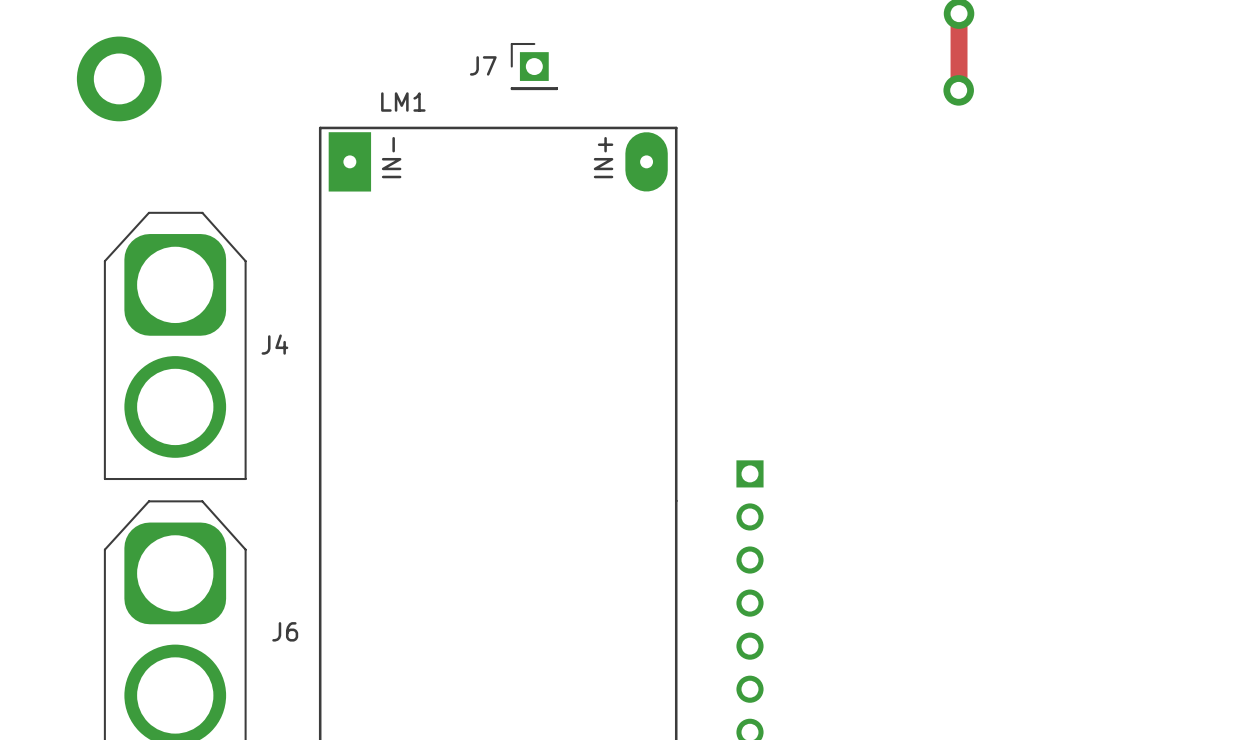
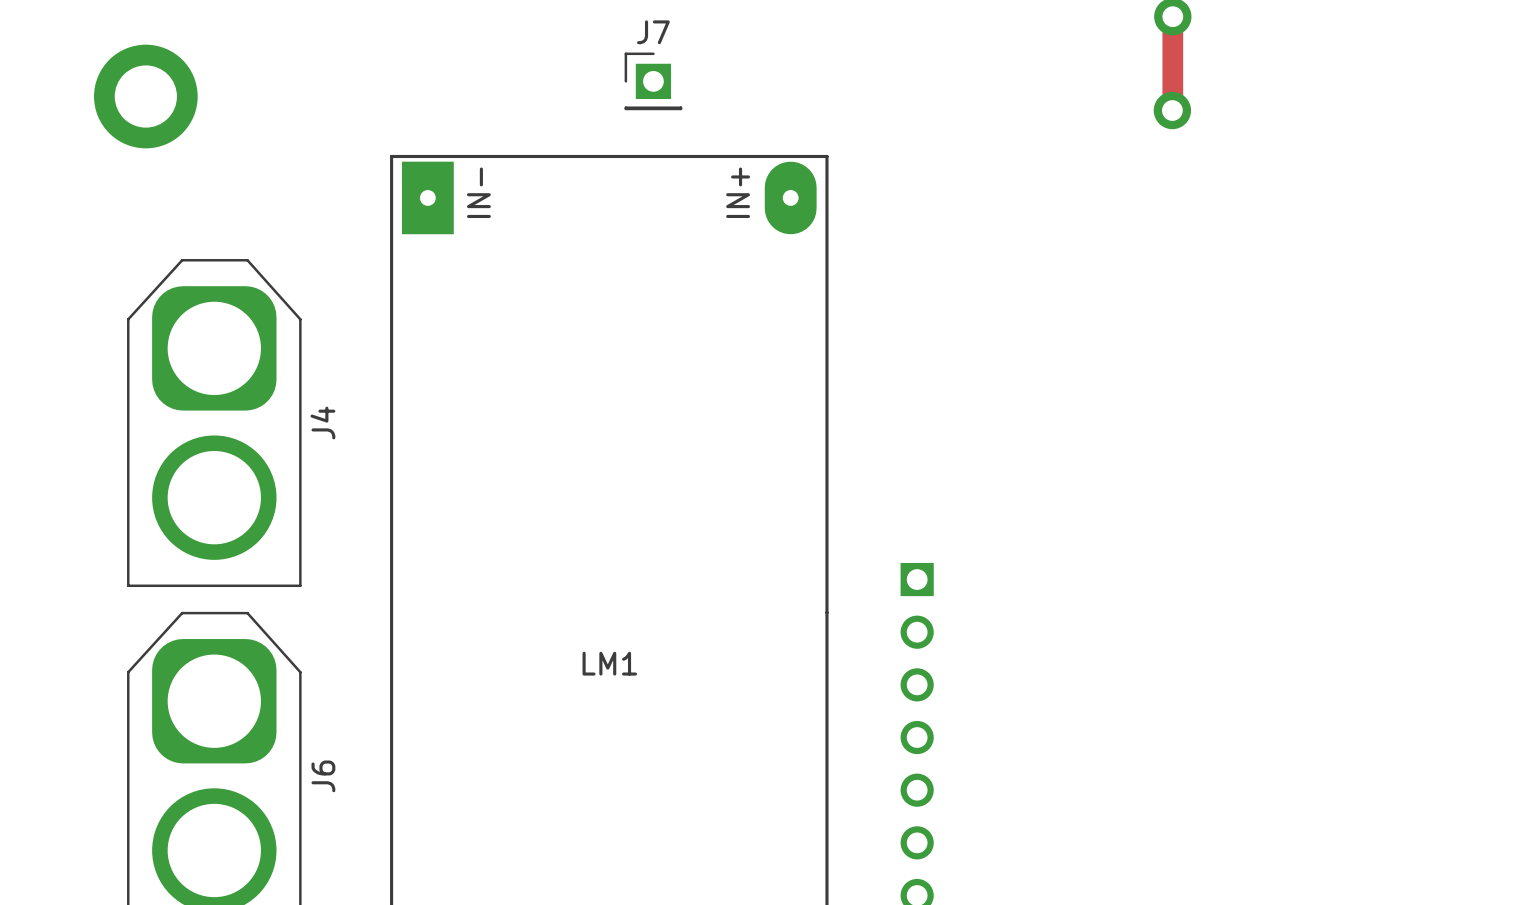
J7 name position: J7 (483, 65) -> J7 (653, 32)
LM1 name position: LM1 (403, 102) -> LM1 (609, 663)
J4 name rotation: 0° (274, 344) -> 90° counterclockwise (322, 423)
J6 name rotation: 0° (285, 631) -> 90° counterclockwise (323, 776)

